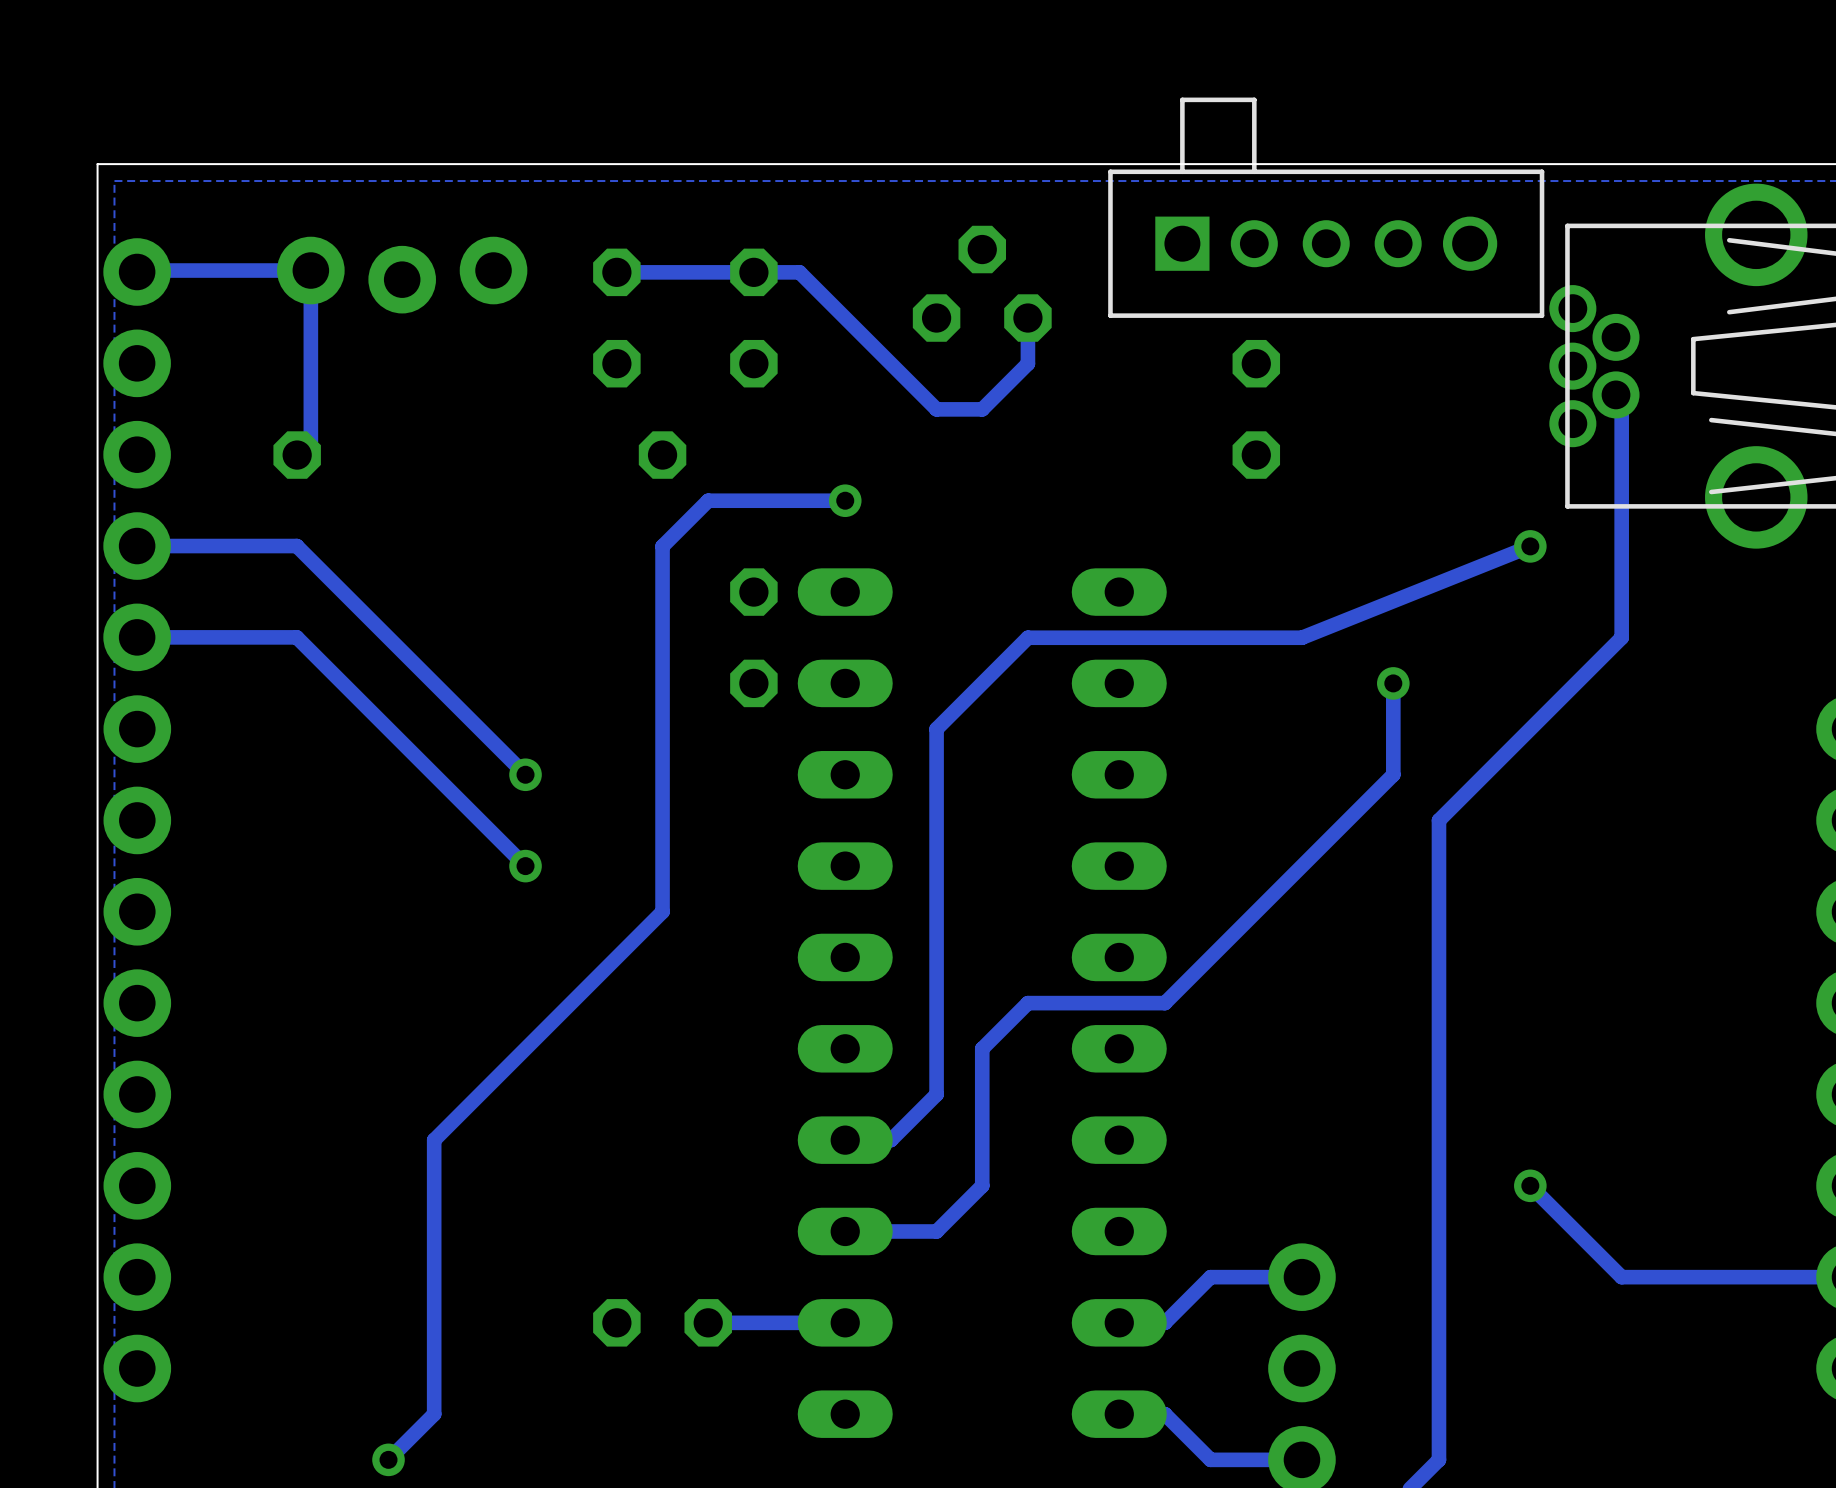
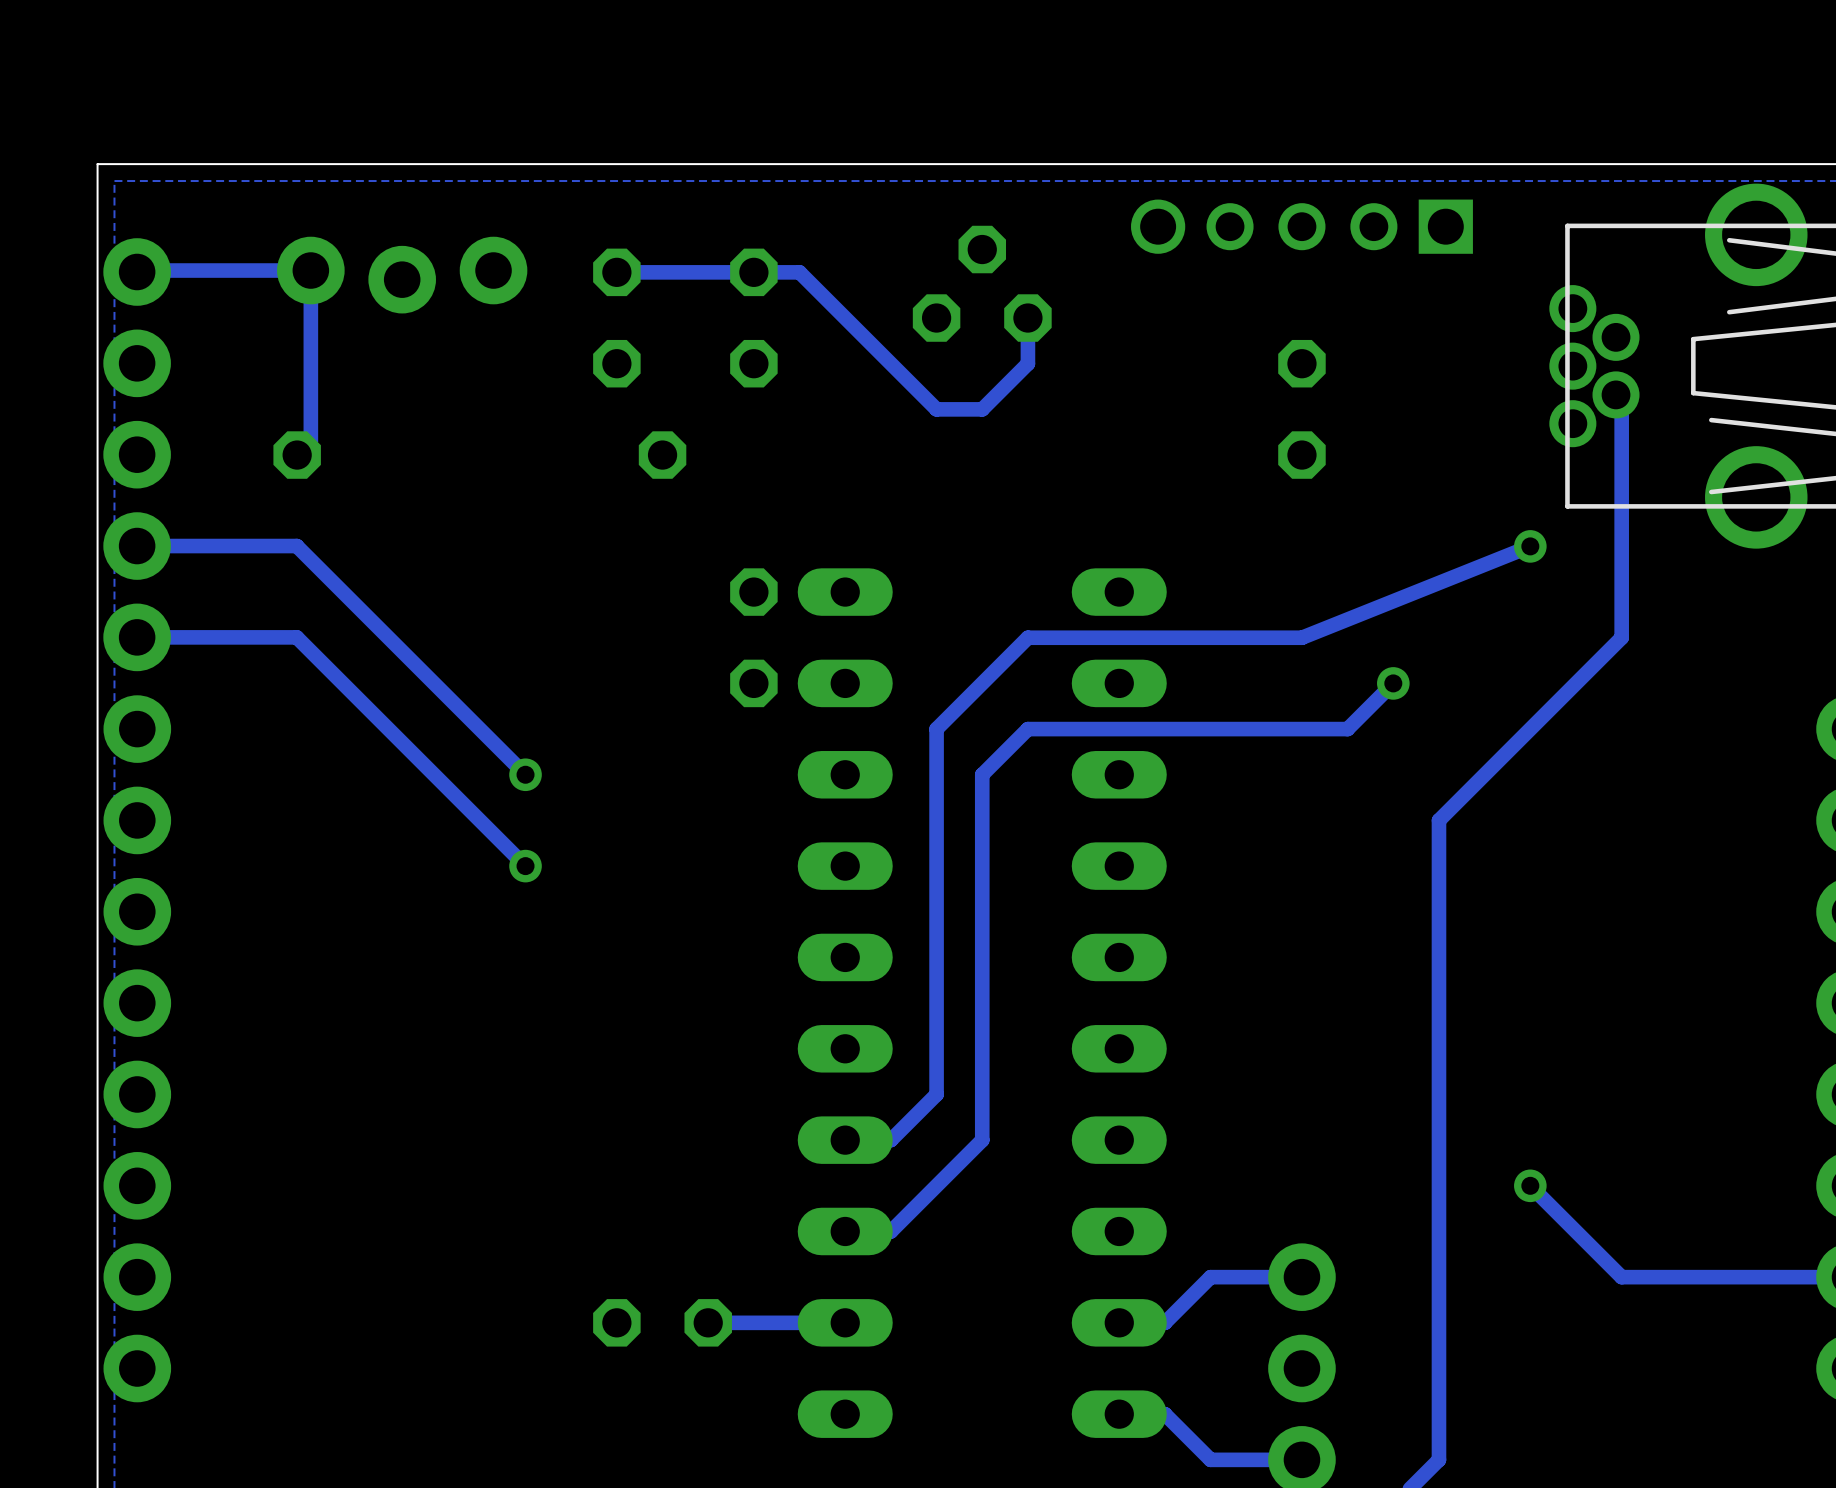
part side: bottom (1326, 207) -> top (1301, 226)
part position: (1256, 409) -> (1301, 409)
track: (845, 500) (708, 500) (662, 546) (662, 911) (434, 1140) (434, 1414) (388, 1459) -> none
via: (845, 500) -> none
track: (1393, 683) (1393, 774) (1164, 1003) (1027, 1003) (982, 1048) -> (1393, 683) (1347, 729) (1027, 729) (982, 774) (982, 1048)
track: (982, 1140) (982, 1185) (936, 1231) (890, 1231) -> (982, 1140) (890, 1231)
via: (388, 1459) -> none

